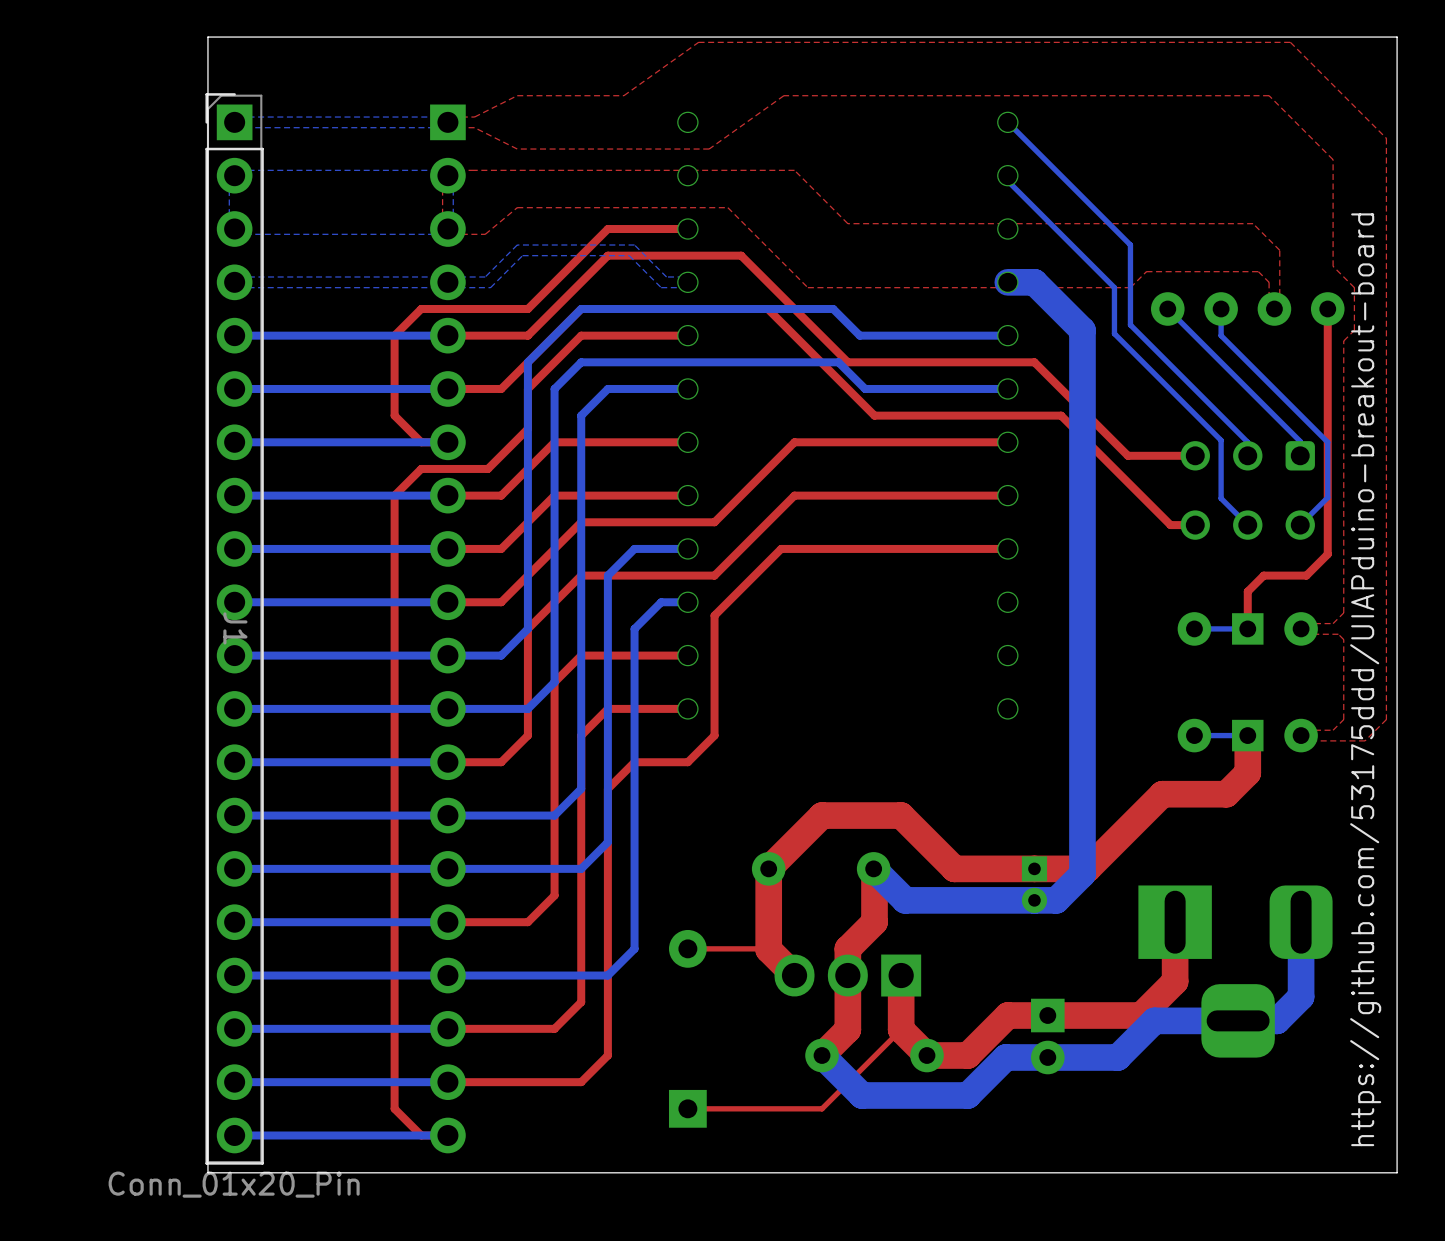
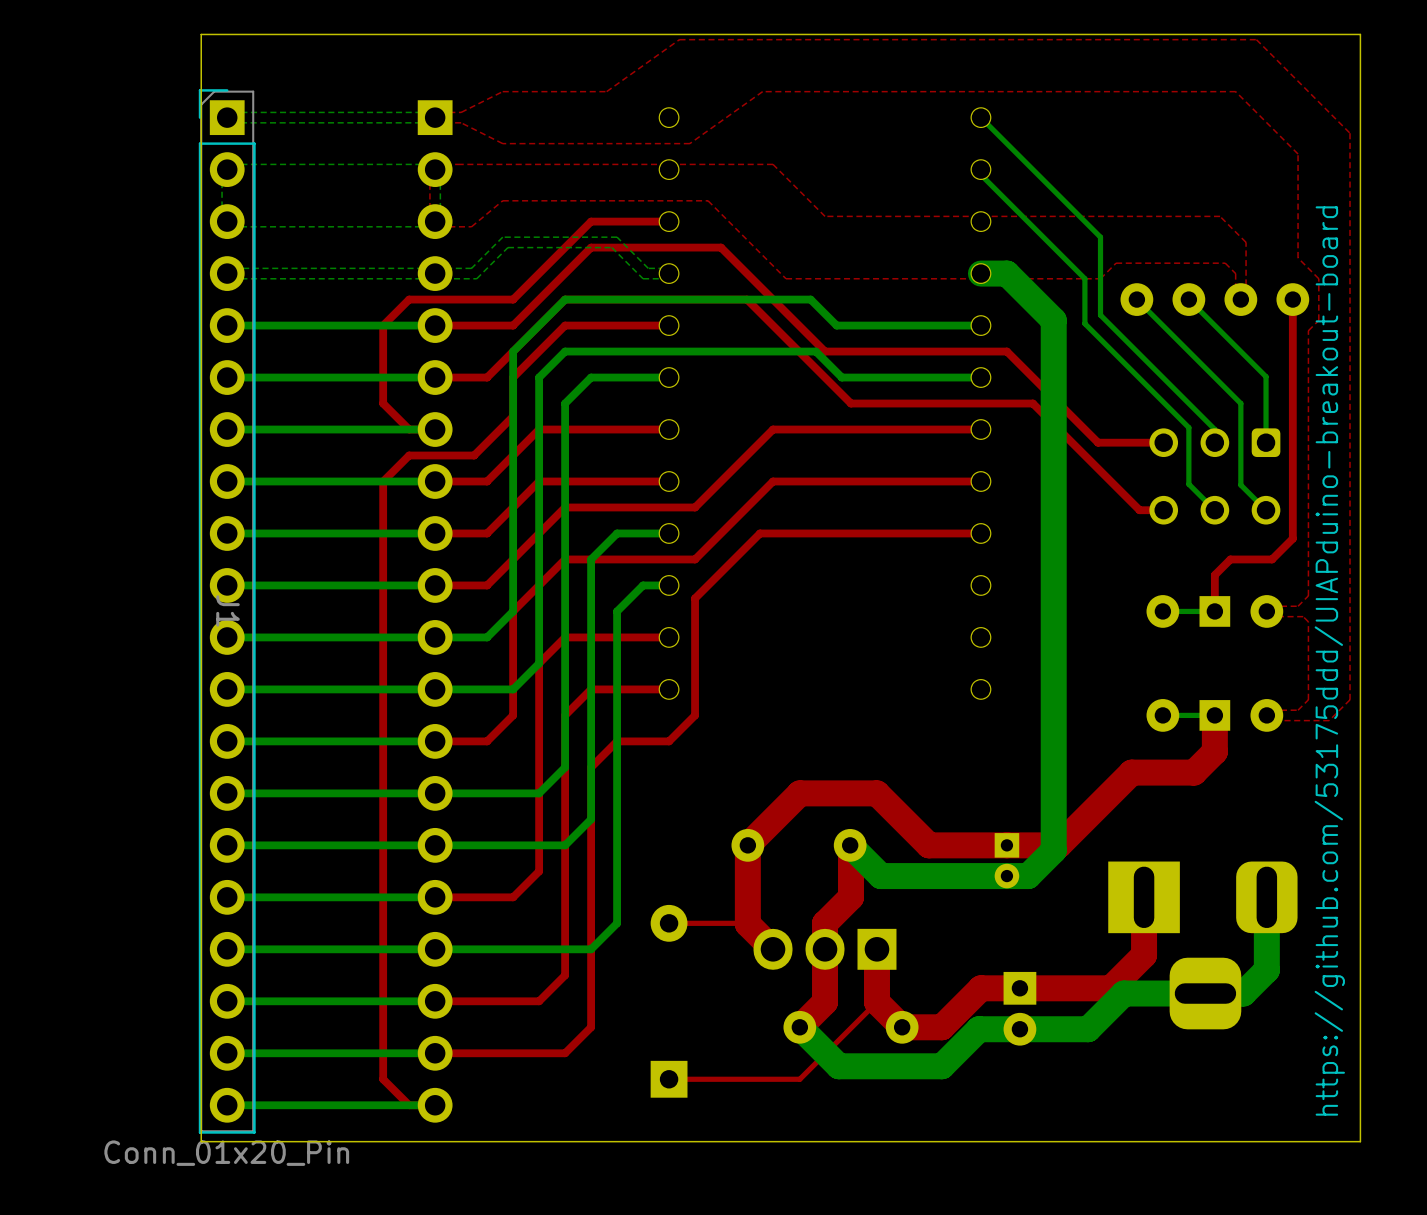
bottom track: (1221, 308) (1221, 335) (1327, 442) (1327, 497) (1300, 525) -> (1188, 299) (1266, 376) (1266, 428)
bottom track: (1274, 415) (1300, 441) -> (1240, 403) (1240, 485) (1266, 510)

